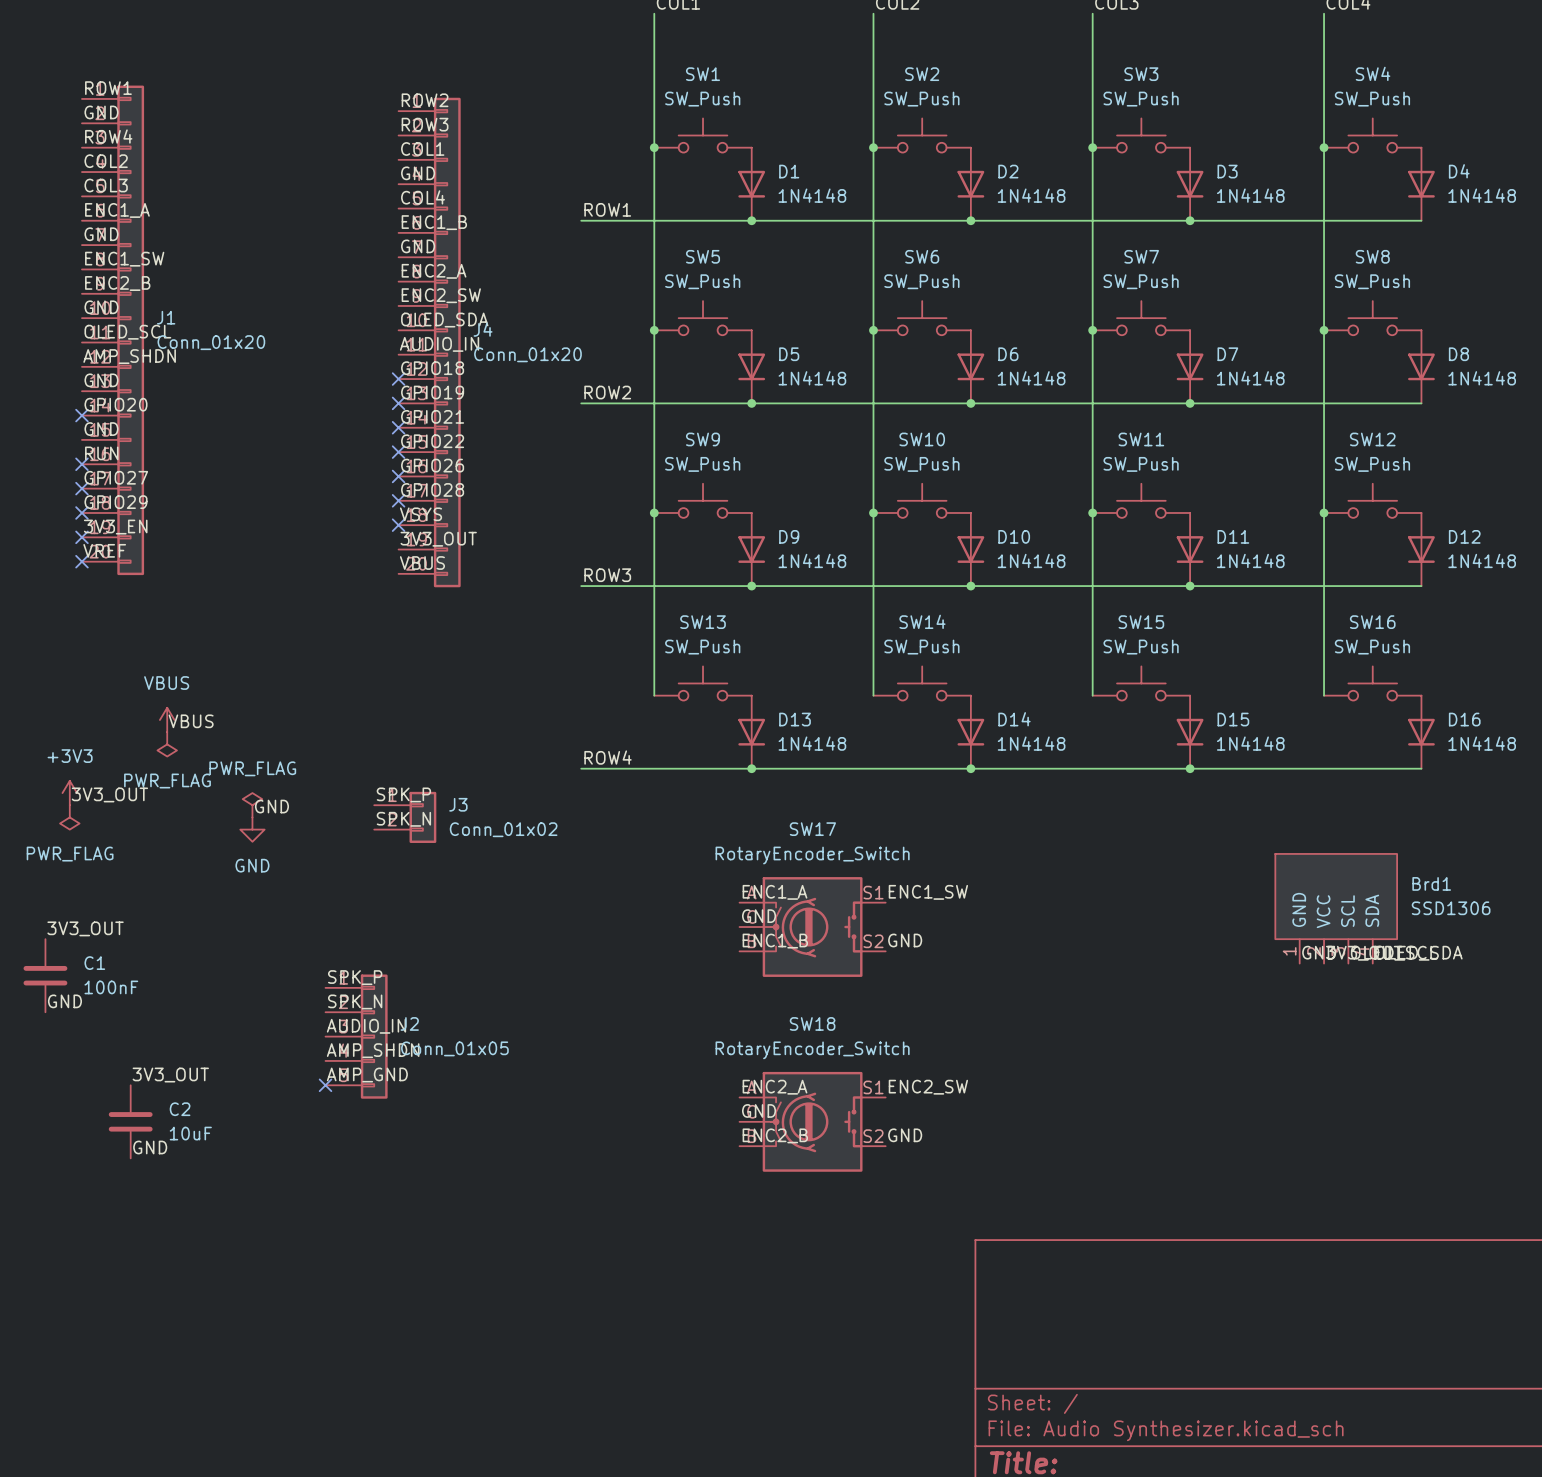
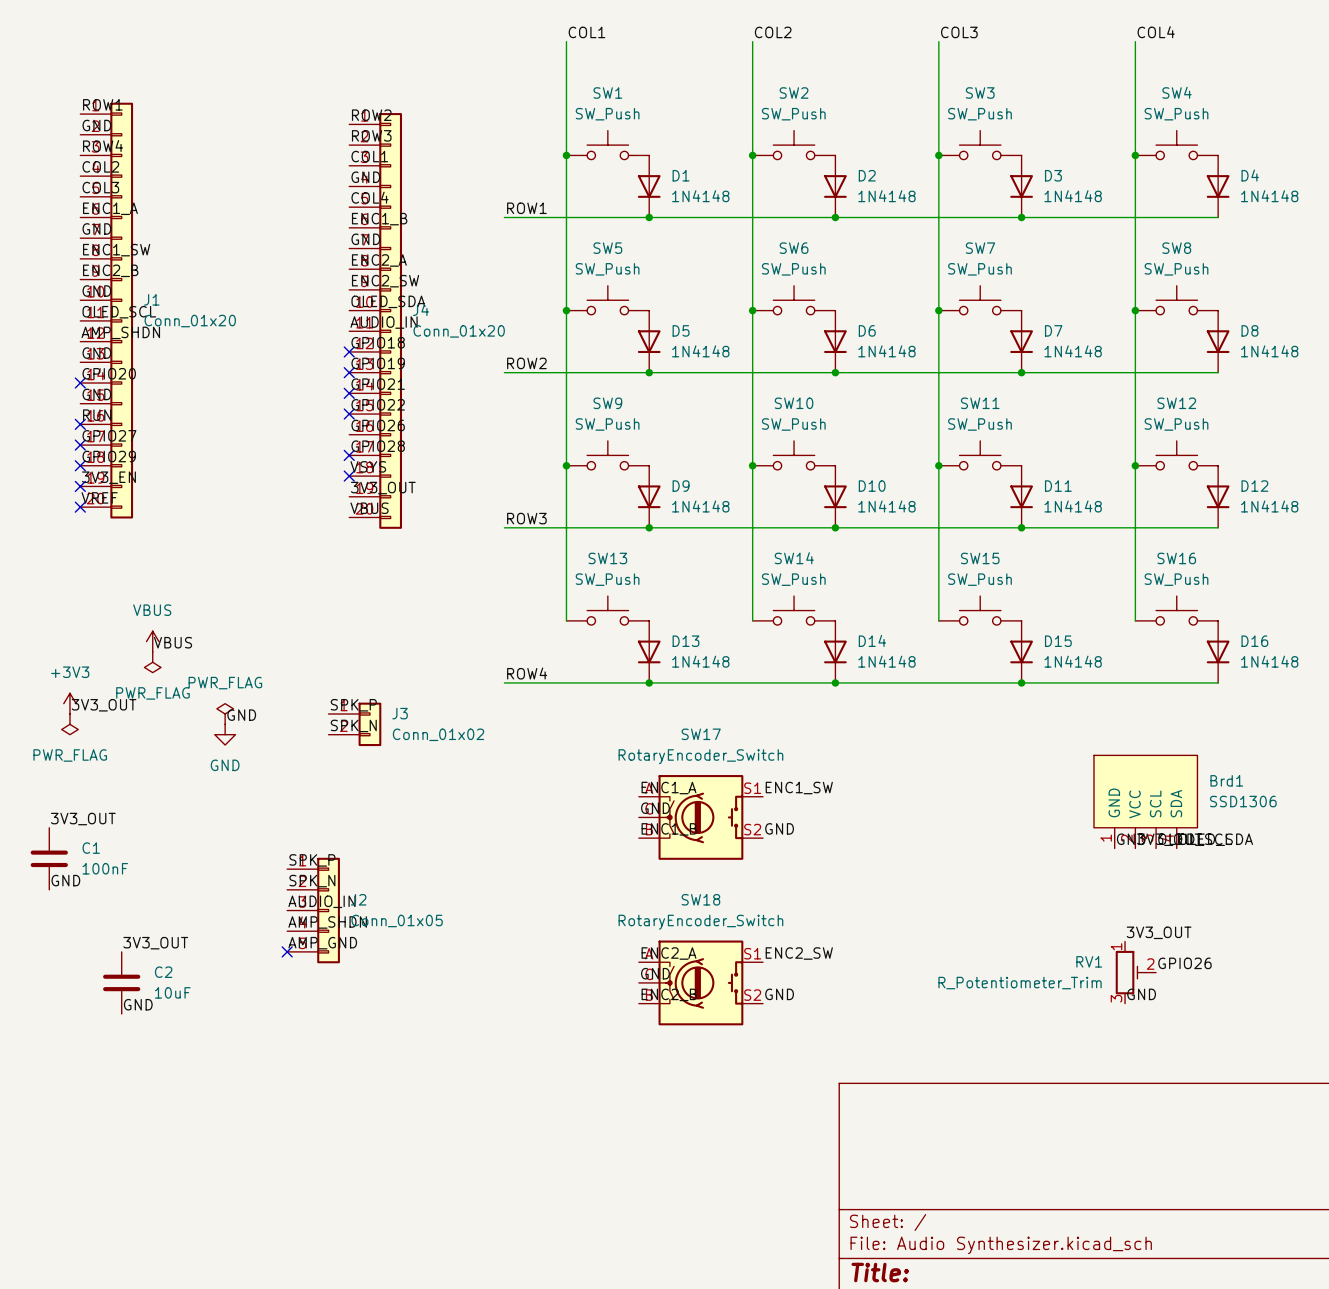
no-connect mark: (398, 476) -> none
label: none -> 3V3_OUT (1159, 932)
label: none -> GPIO26 (1184, 963)
RV1: none -> R_Potentiometer_Trim (1135, 972)
label: none -> GND (1141, 994)

